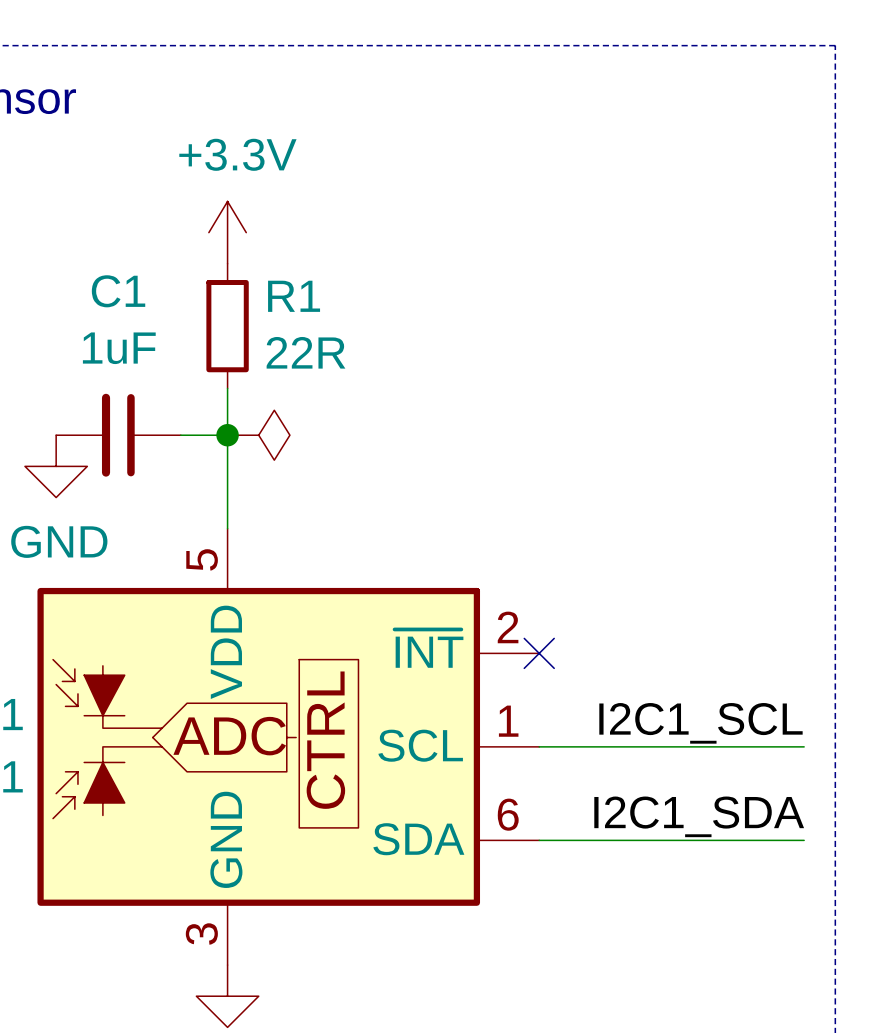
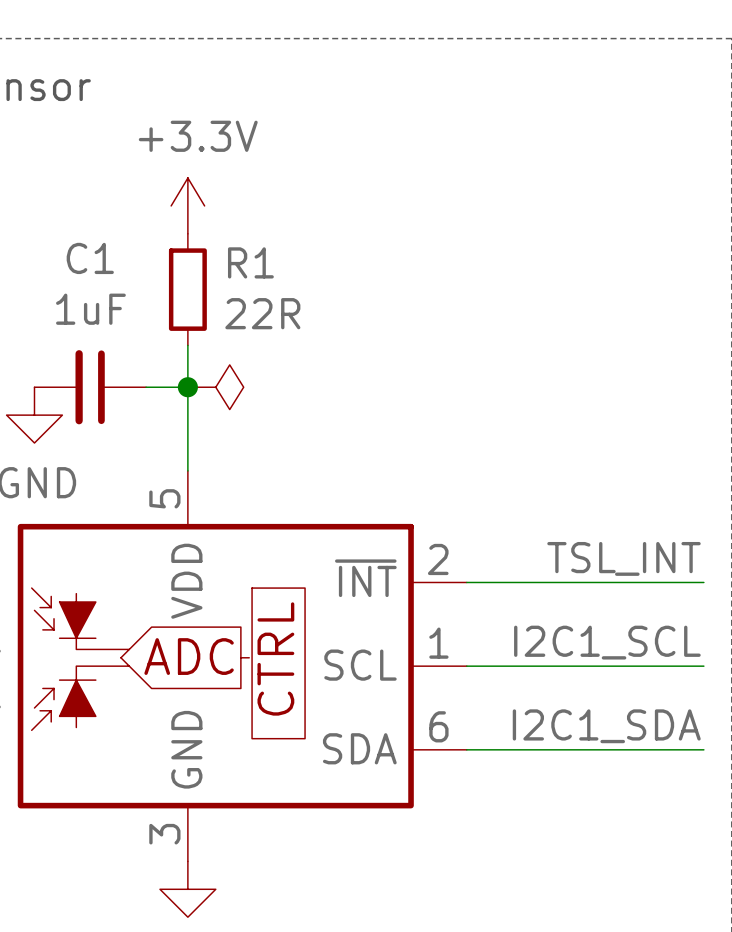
label: none -> TSL_INT (623, 558)
wire: none -> (466, 582) (703, 582)
no-connect mark: (539, 653) -> none

